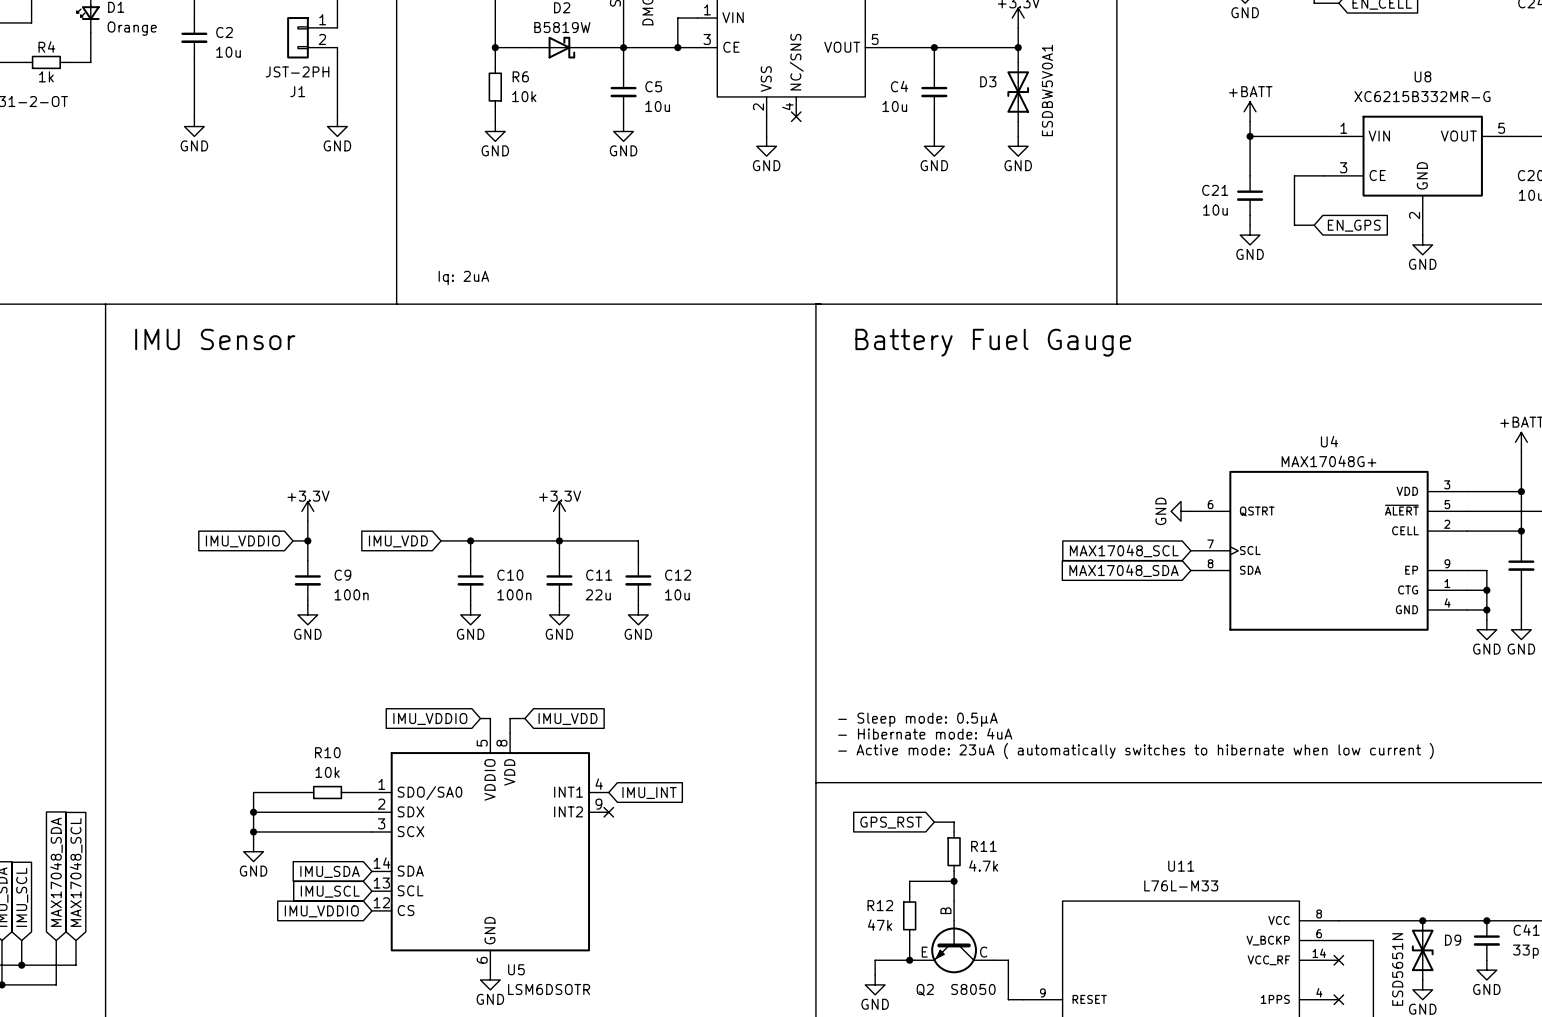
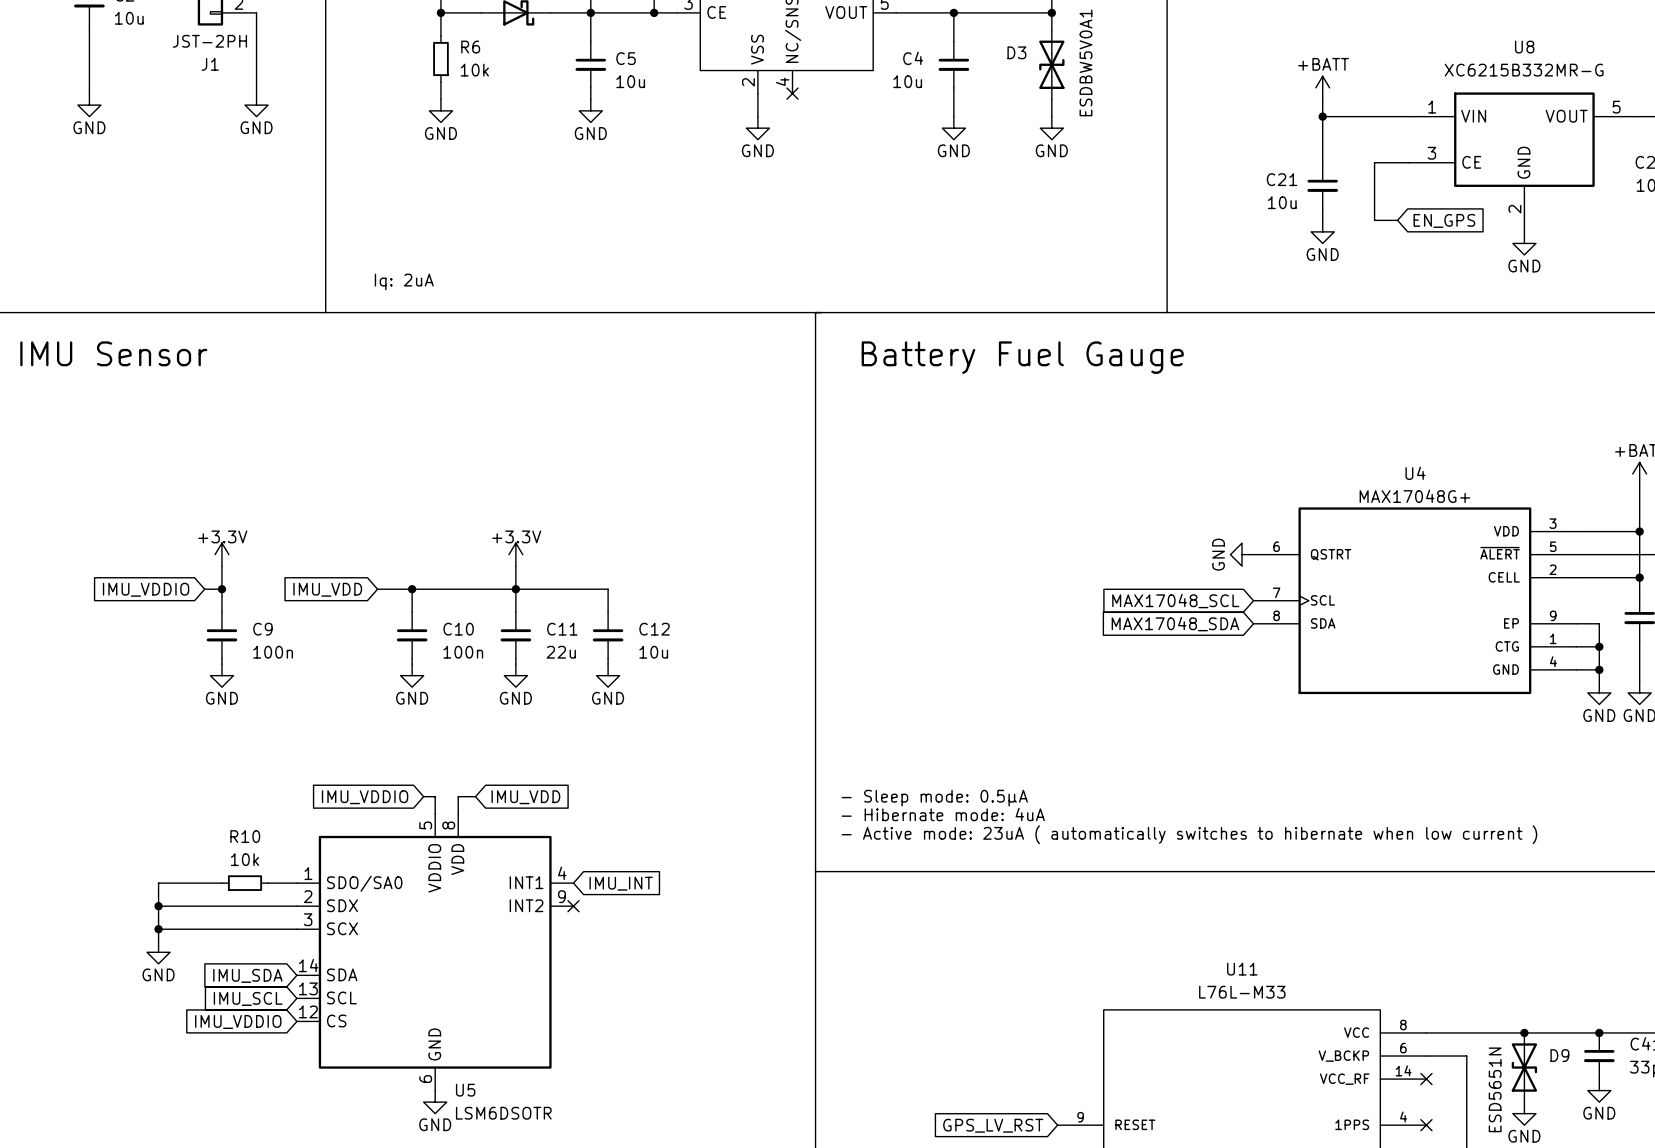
global label: GPS_RST (891, 822) -> none
wire: (934, 822) (954, 822) (954, 831) -> none
R11: 4.7k (954, 851) -> none
wire: (954, 871) (954, 901) -> none
wire: (954, 881) (909, 881) (909, 896) -> none
junction: (954, 881) -> none
R12: 47k (909, 915) -> none
wire: (909, 935) (909, 960) -> none
Q2: S8050 (954, 937) -> none
junction: (909, 960) -> none
wire: (914, 960) (875, 960) (875, 975) -> none
wire: (993, 960) (1008, 960) (1008, 999) (1023, 999) -> none
power symbol: GND (875, 984) -> none
global label: none -> GPS_LV_RST (993, 1125)

